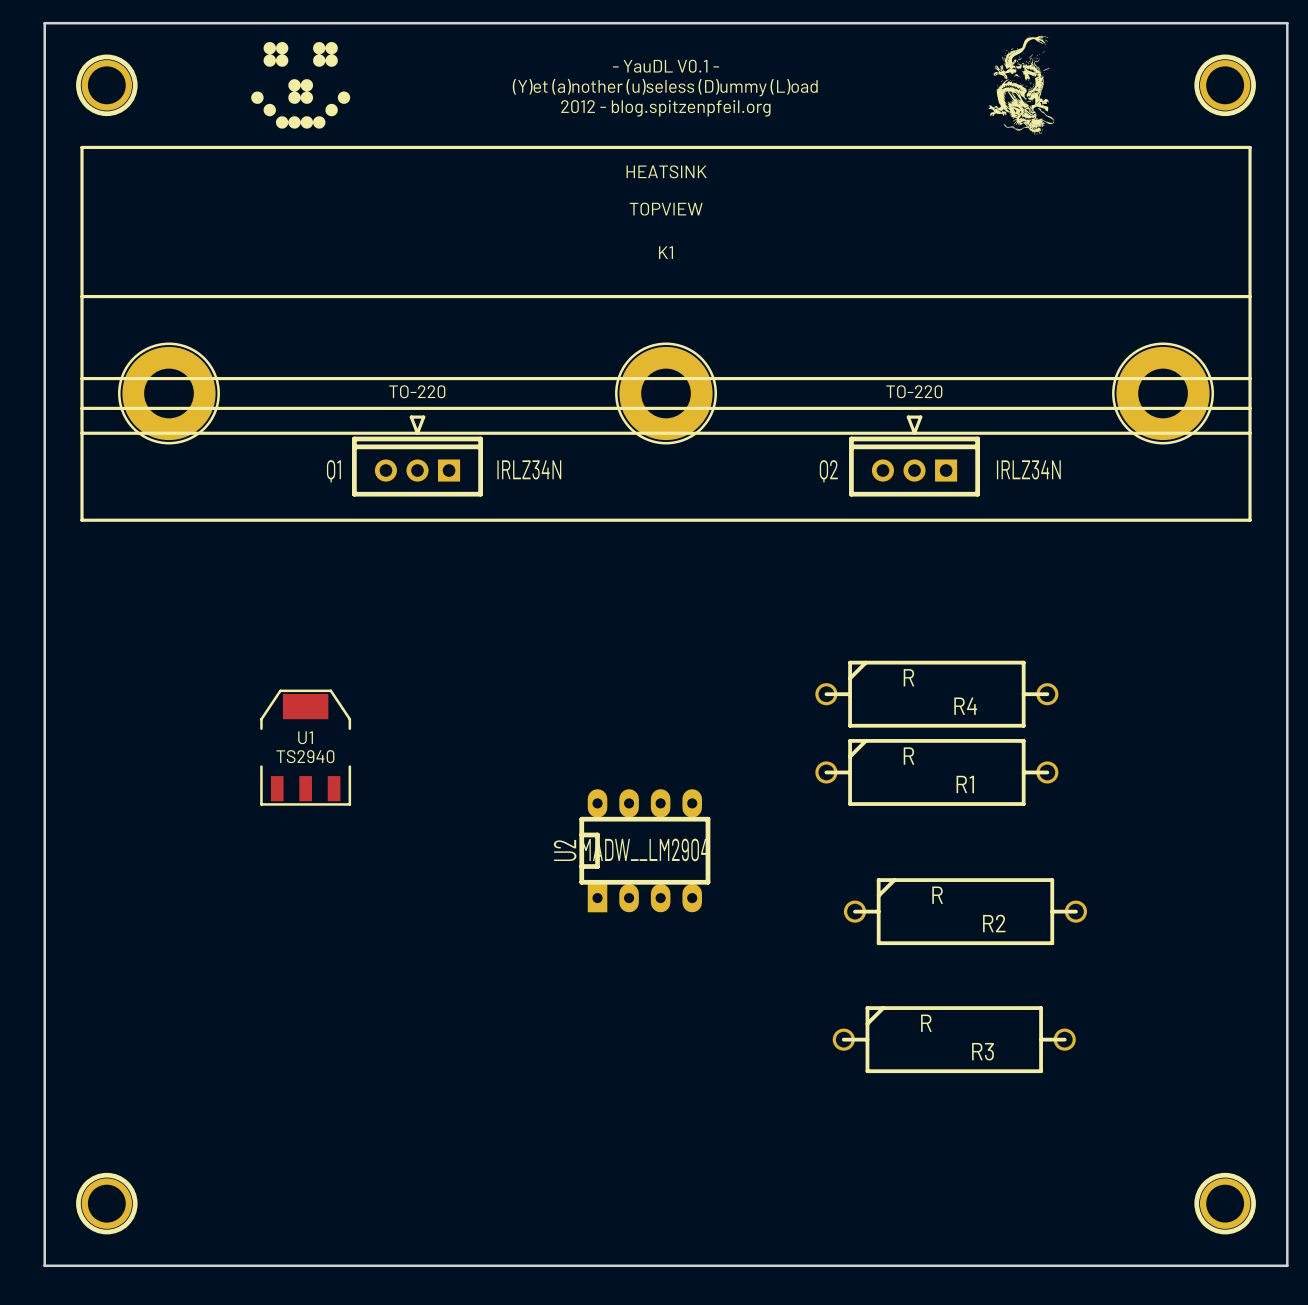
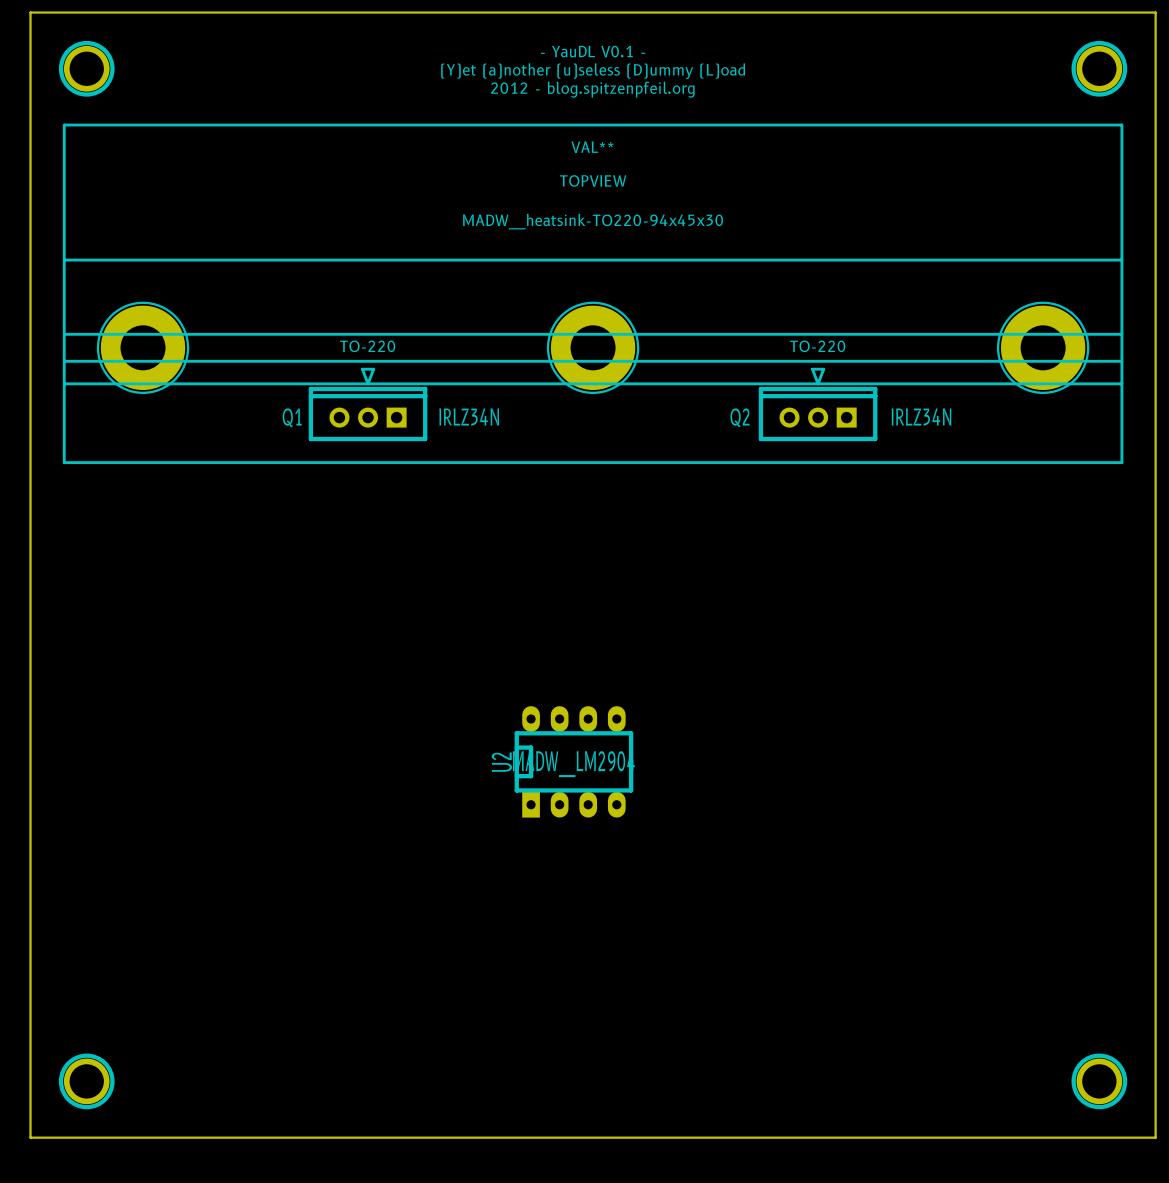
drawing: [988, 35, 1055, 135] -> none
drawing: [251, 42, 351, 129] -> none
K1 value: HEATSINK (666, 171) -> VAL** (592, 147)
K1 name: K1 (666, 252) -> MADW__heatsink-TO220-94x45x30 (593, 221)
R4: R (936, 694) -> none
U1: TS2940 (305, 747) -> none
R1: R (936, 772) -> none
R2: R (965, 911) -> none
R3: R (954, 1039) -> none

